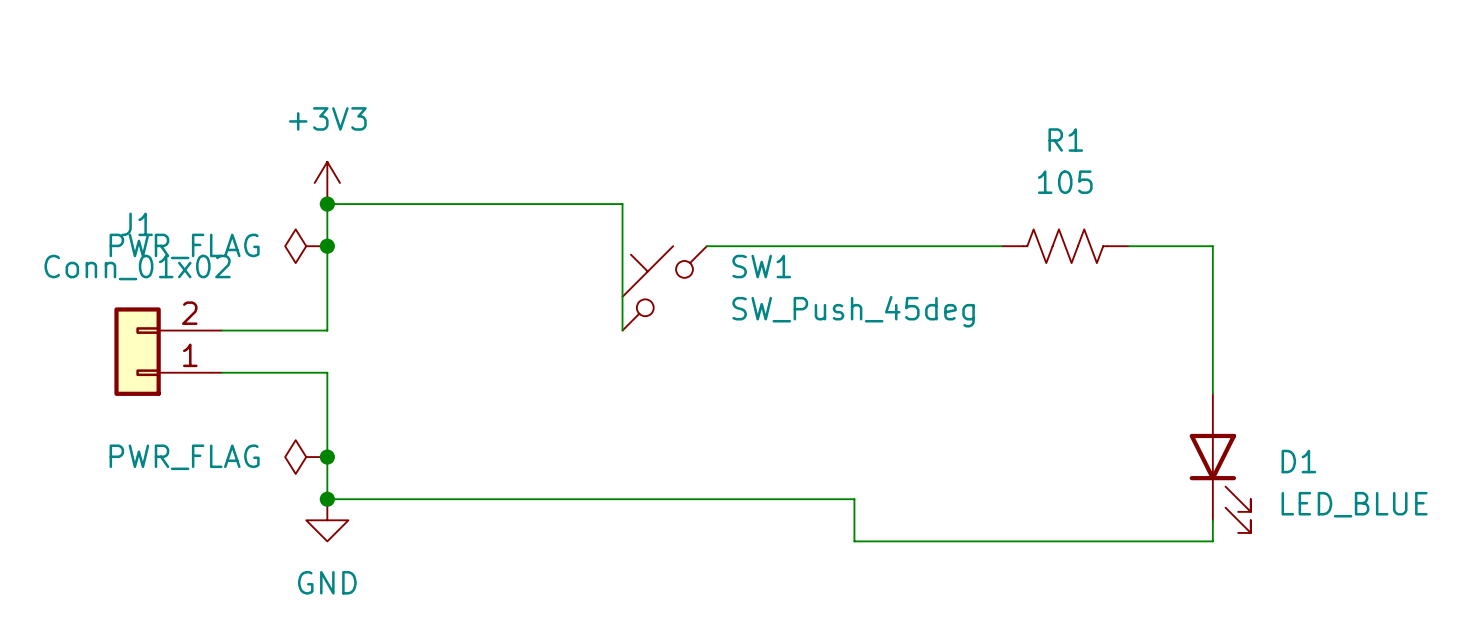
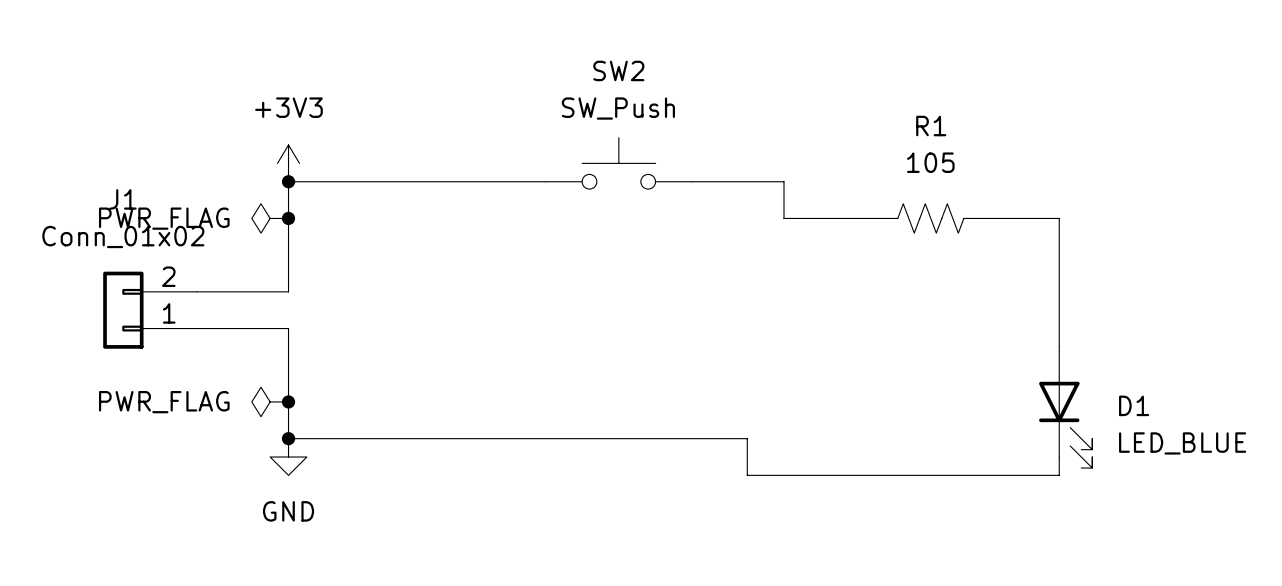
SW2: none -> SW_Push (618, 163)
wire: (622, 204) (622, 330) -> none
wire: (706, 246) (896, 246) -> (692, 181) (784, 181) (784, 218)
SW1: SW_Push_45deg (664, 288) -> none

